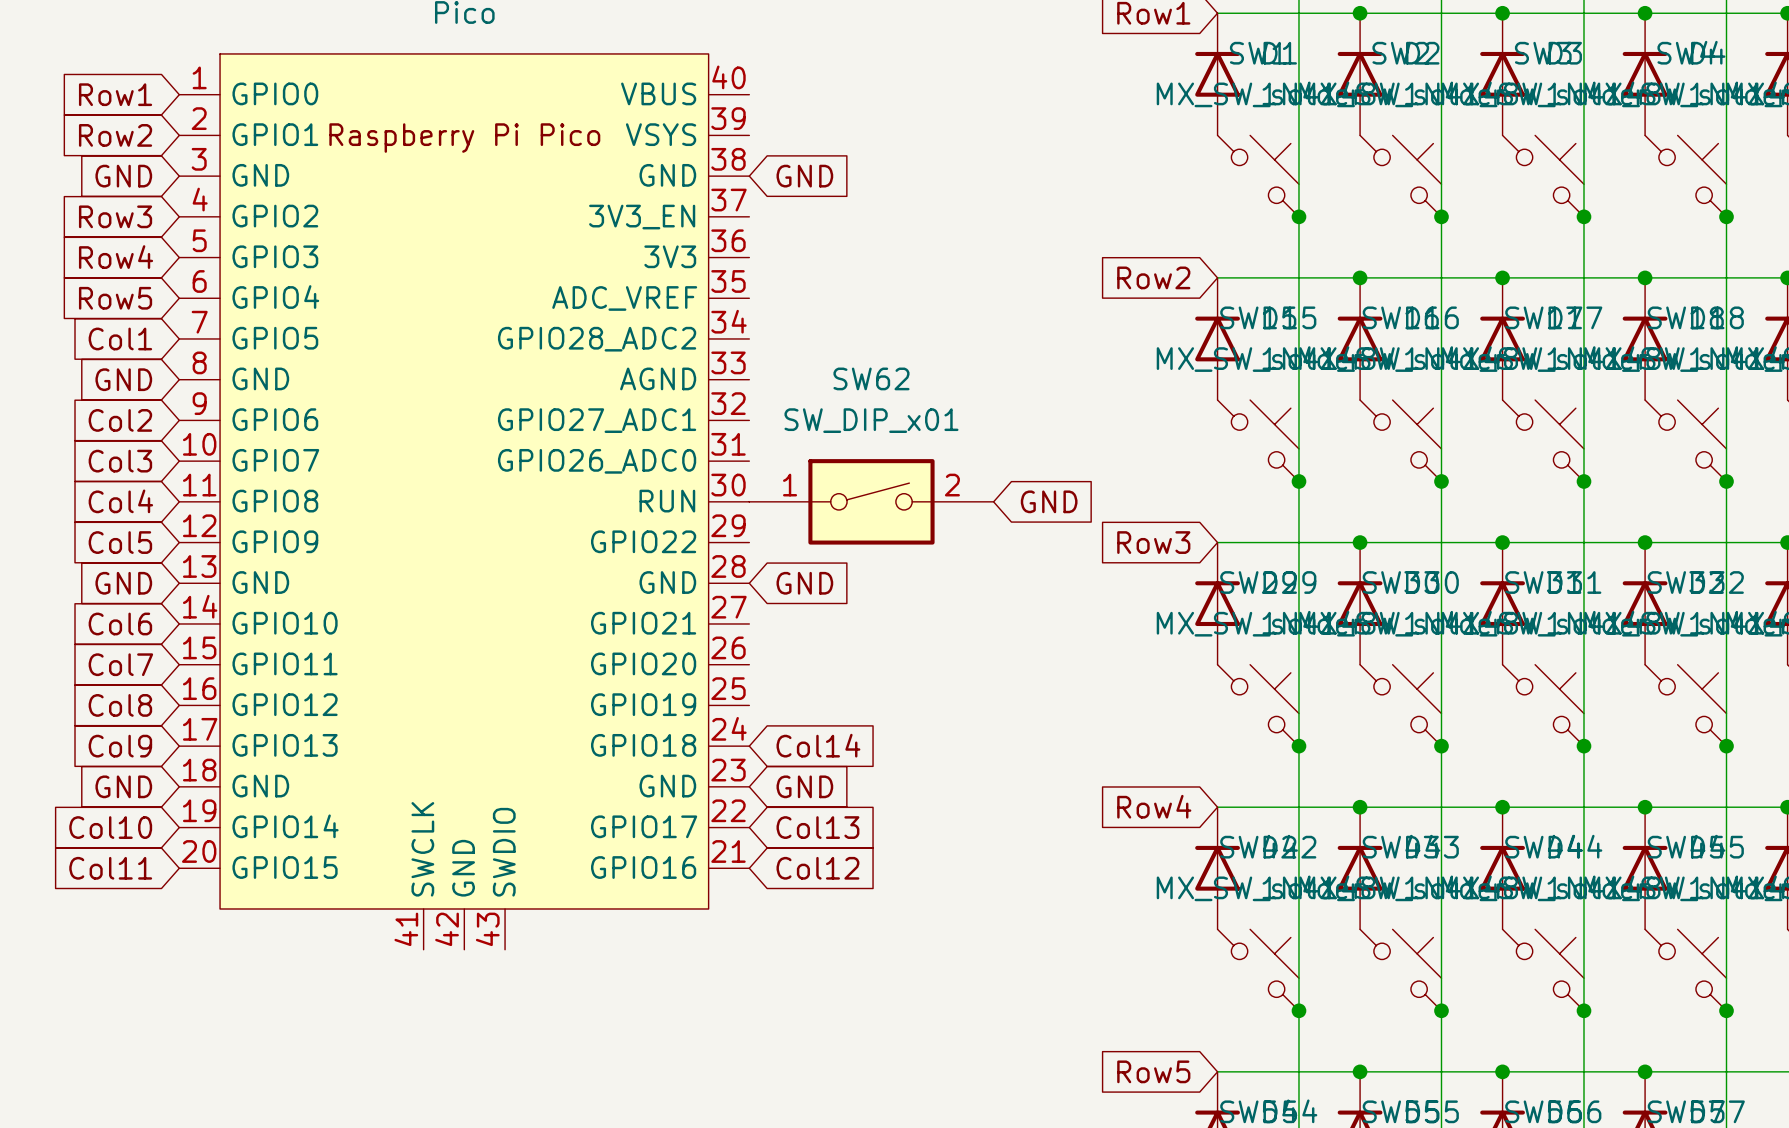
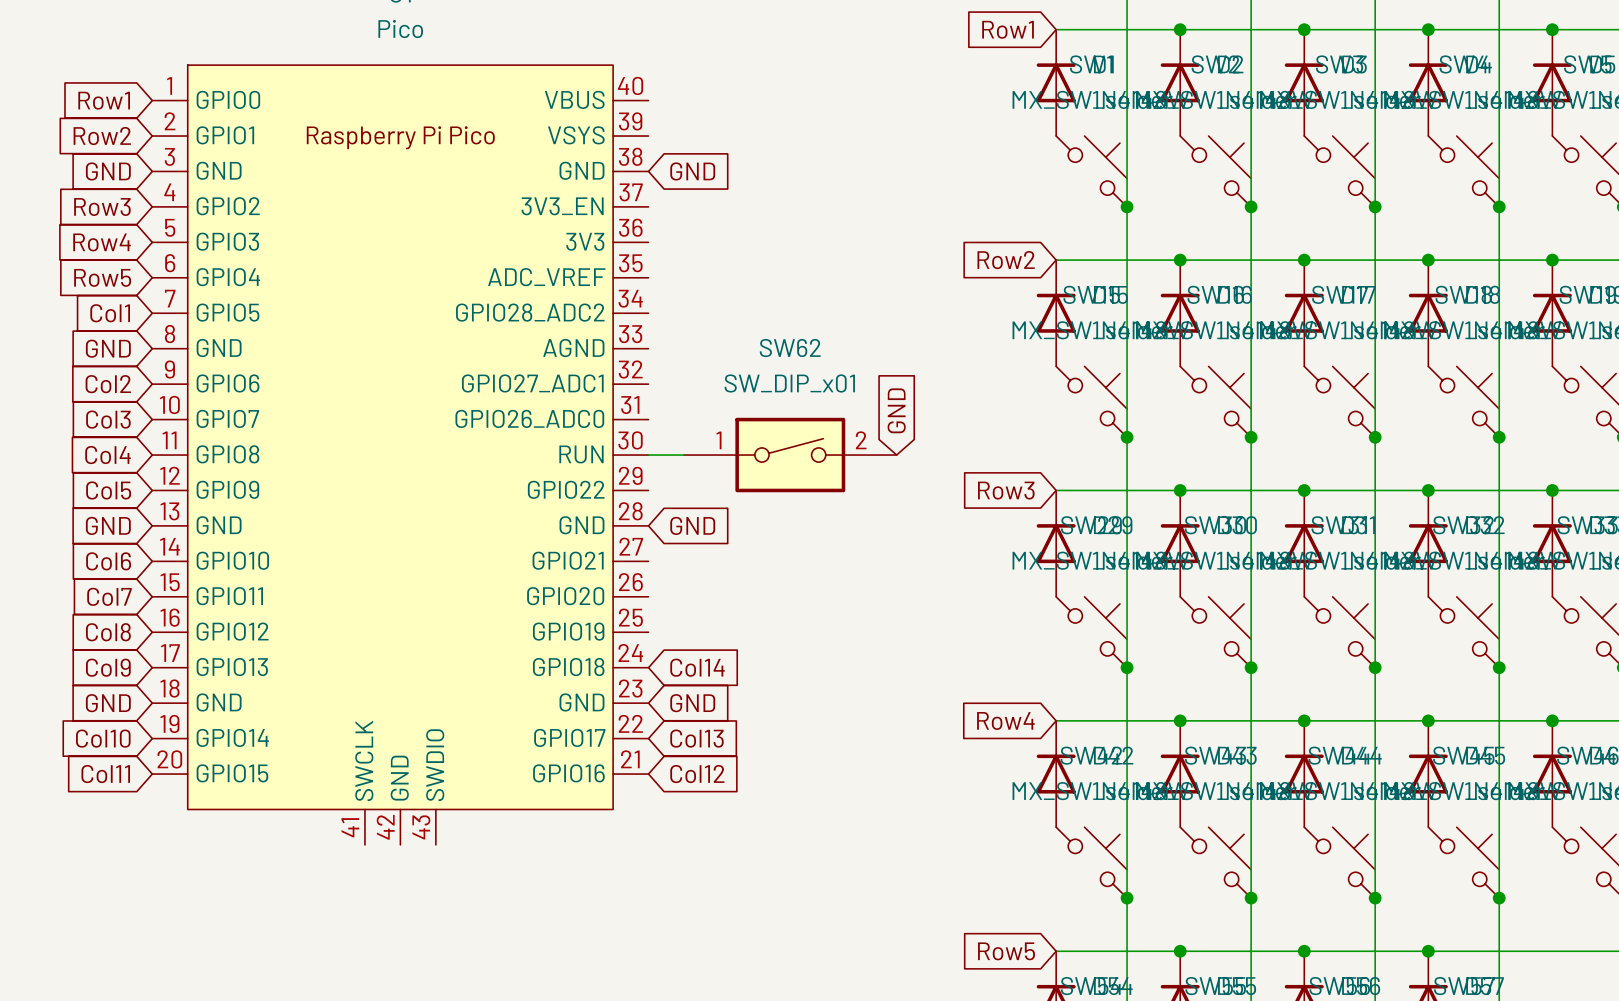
SW62 position: (871, 501) -> (790, 455)
global label rotation: 0° (1049, 501) -> 90° counterclockwise (896, 410)

